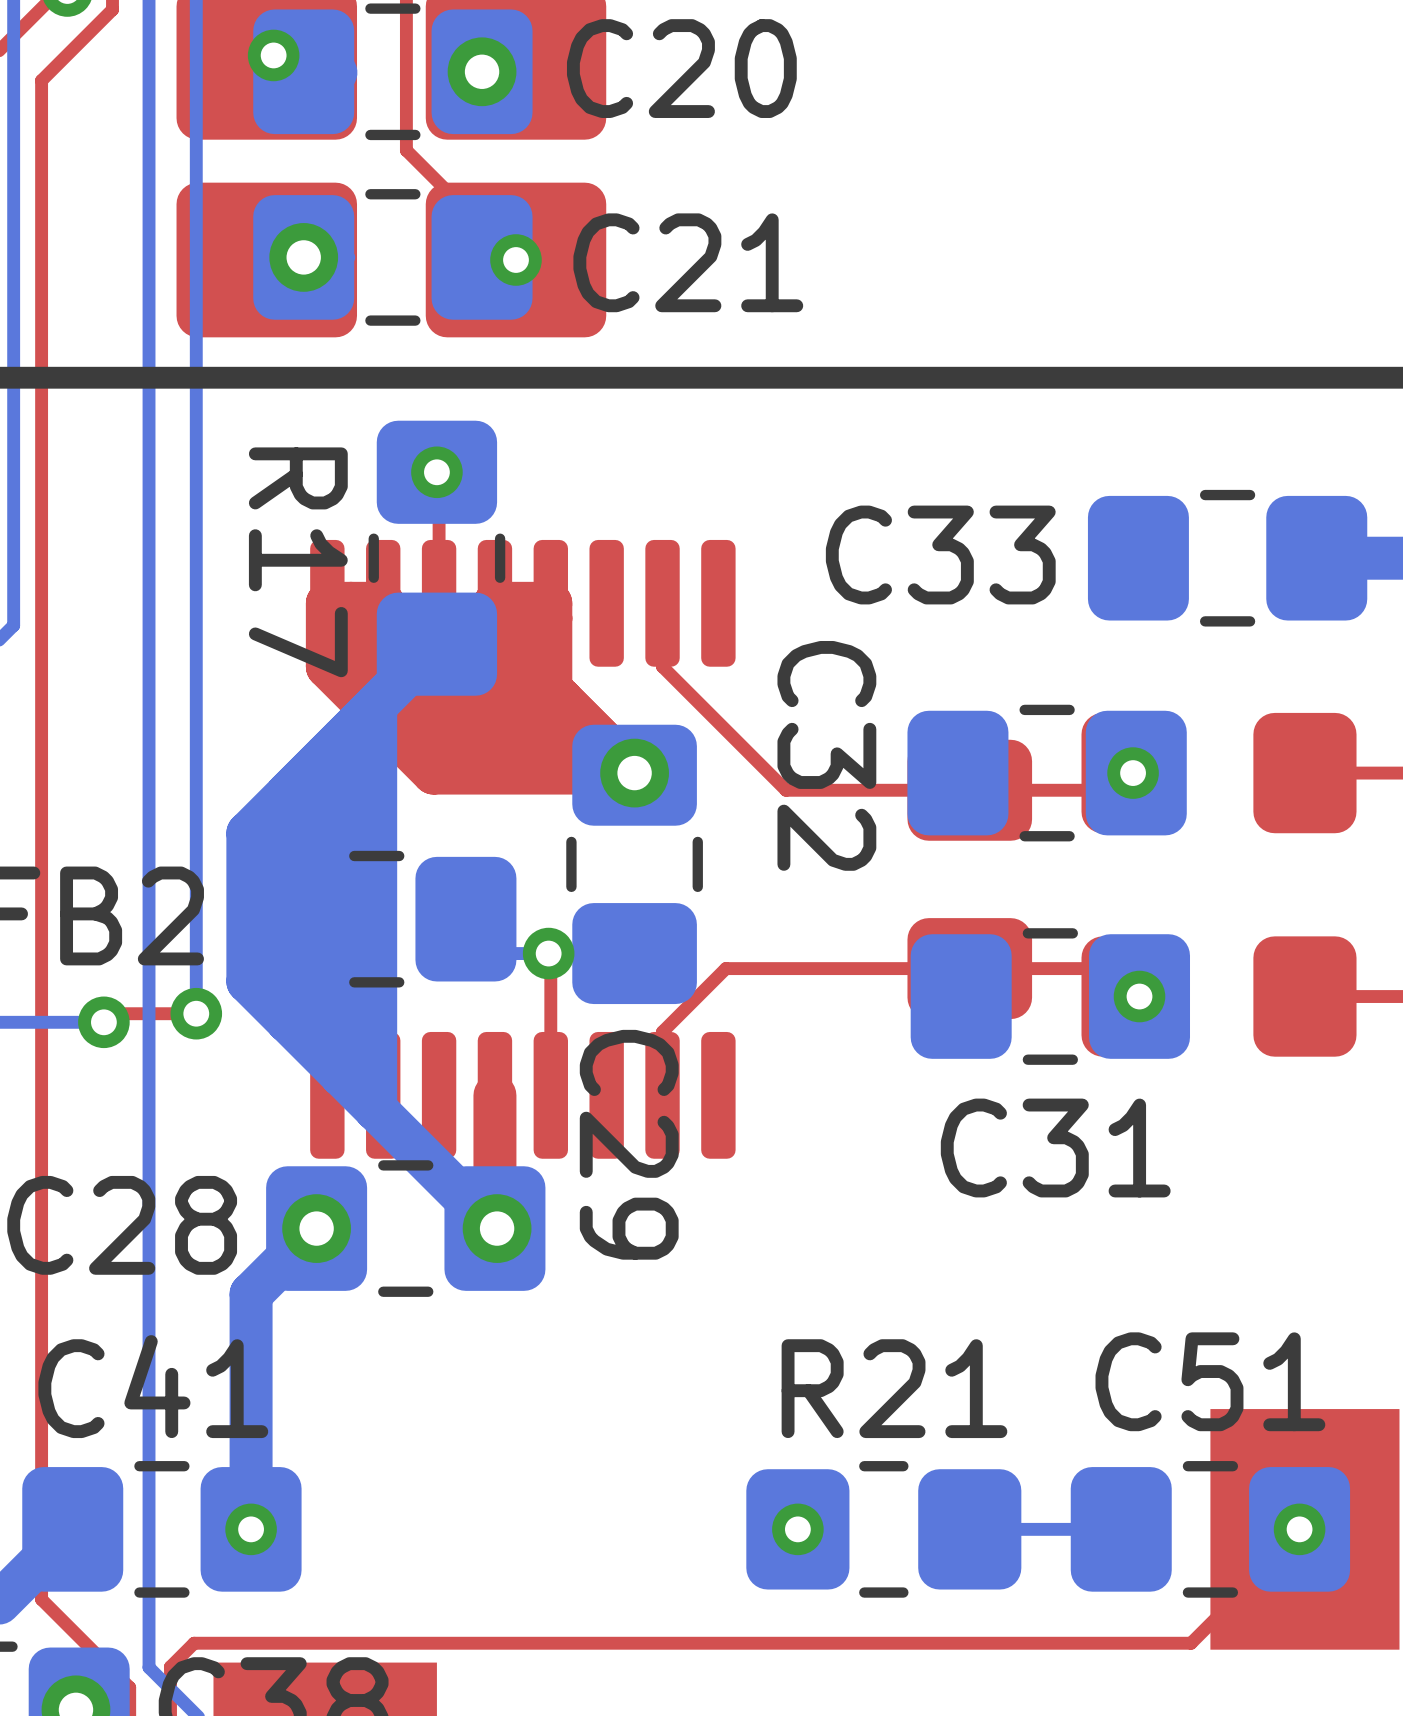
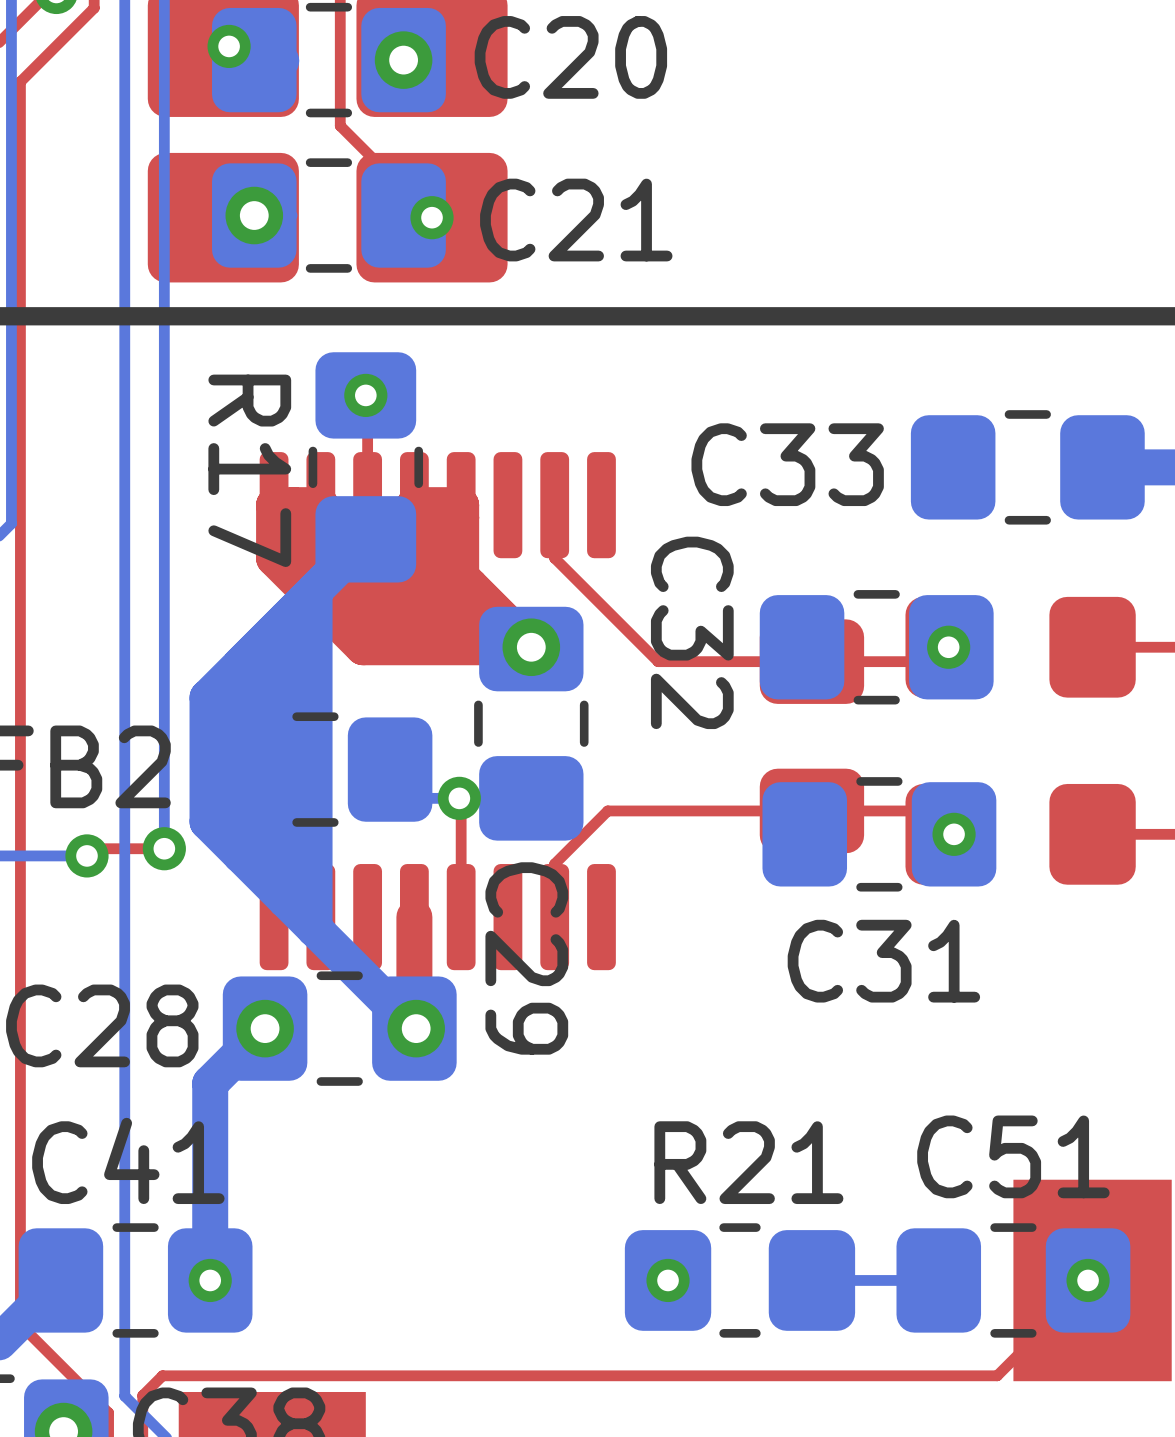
top track: (41, 80) (41, 1599) -> (34, 67) (20, 81) (20, 1324) (34, 1339)

